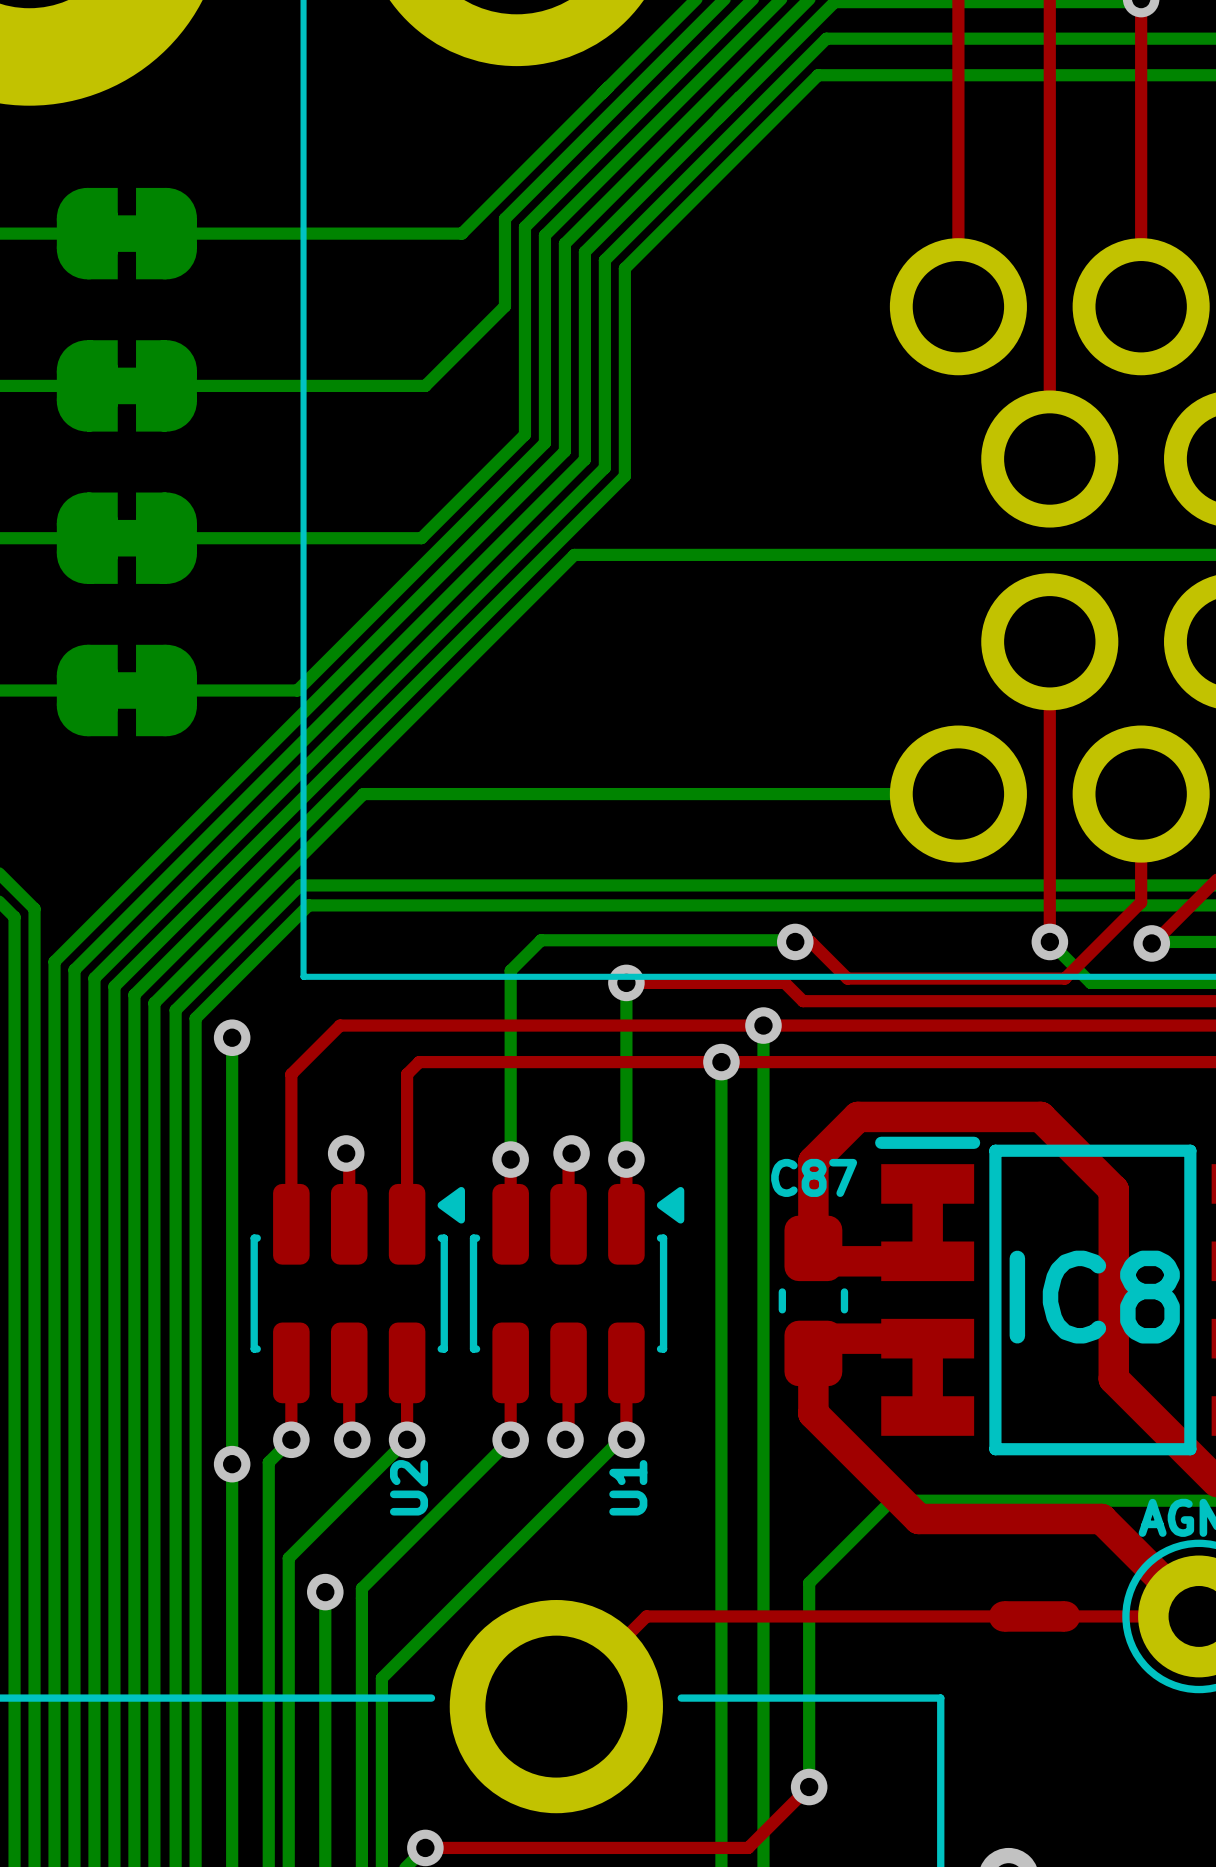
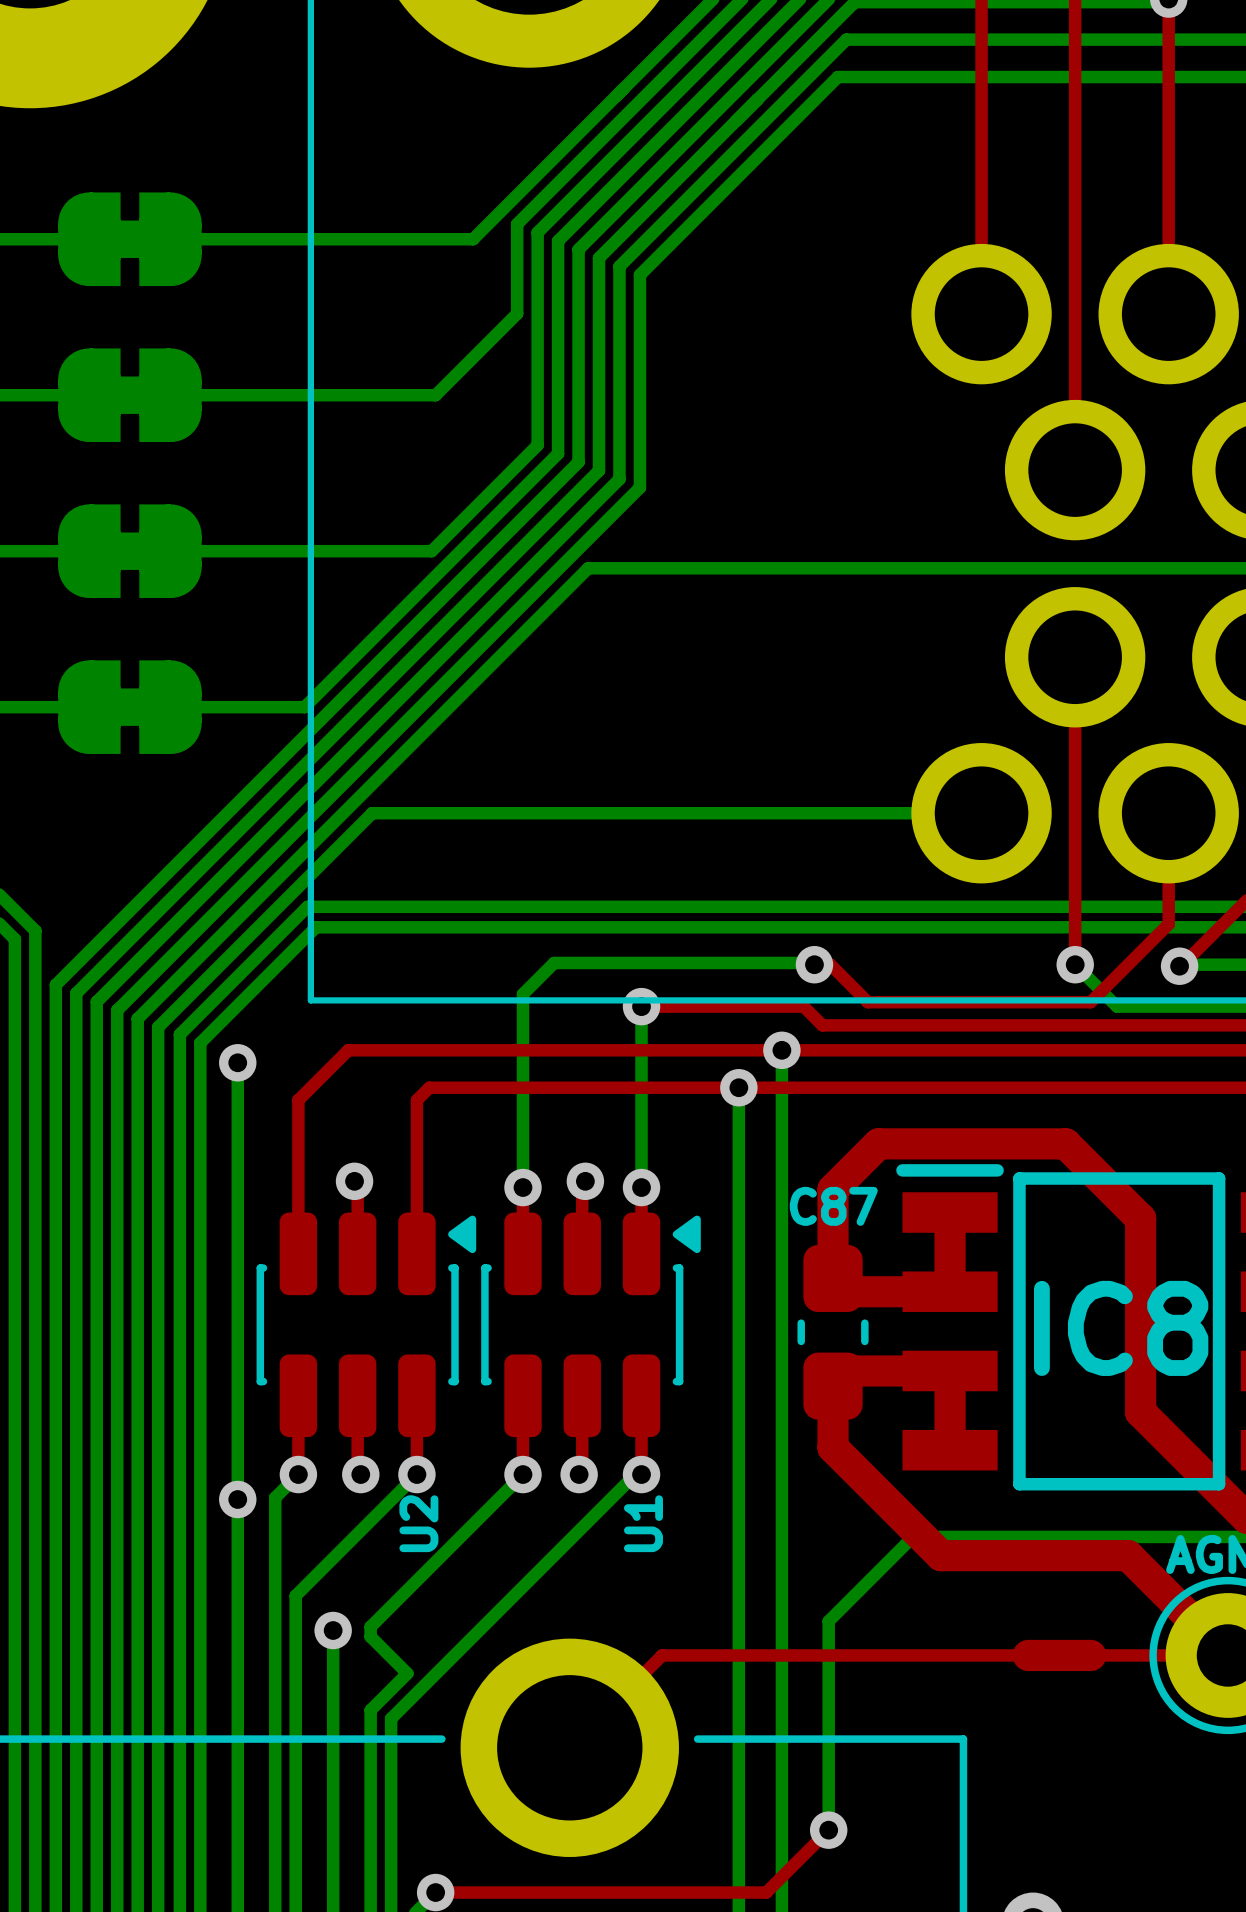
bottom track: (361, 1598) (361, 1669) -> (370, 1636) (407, 1673) (370, 1710)

